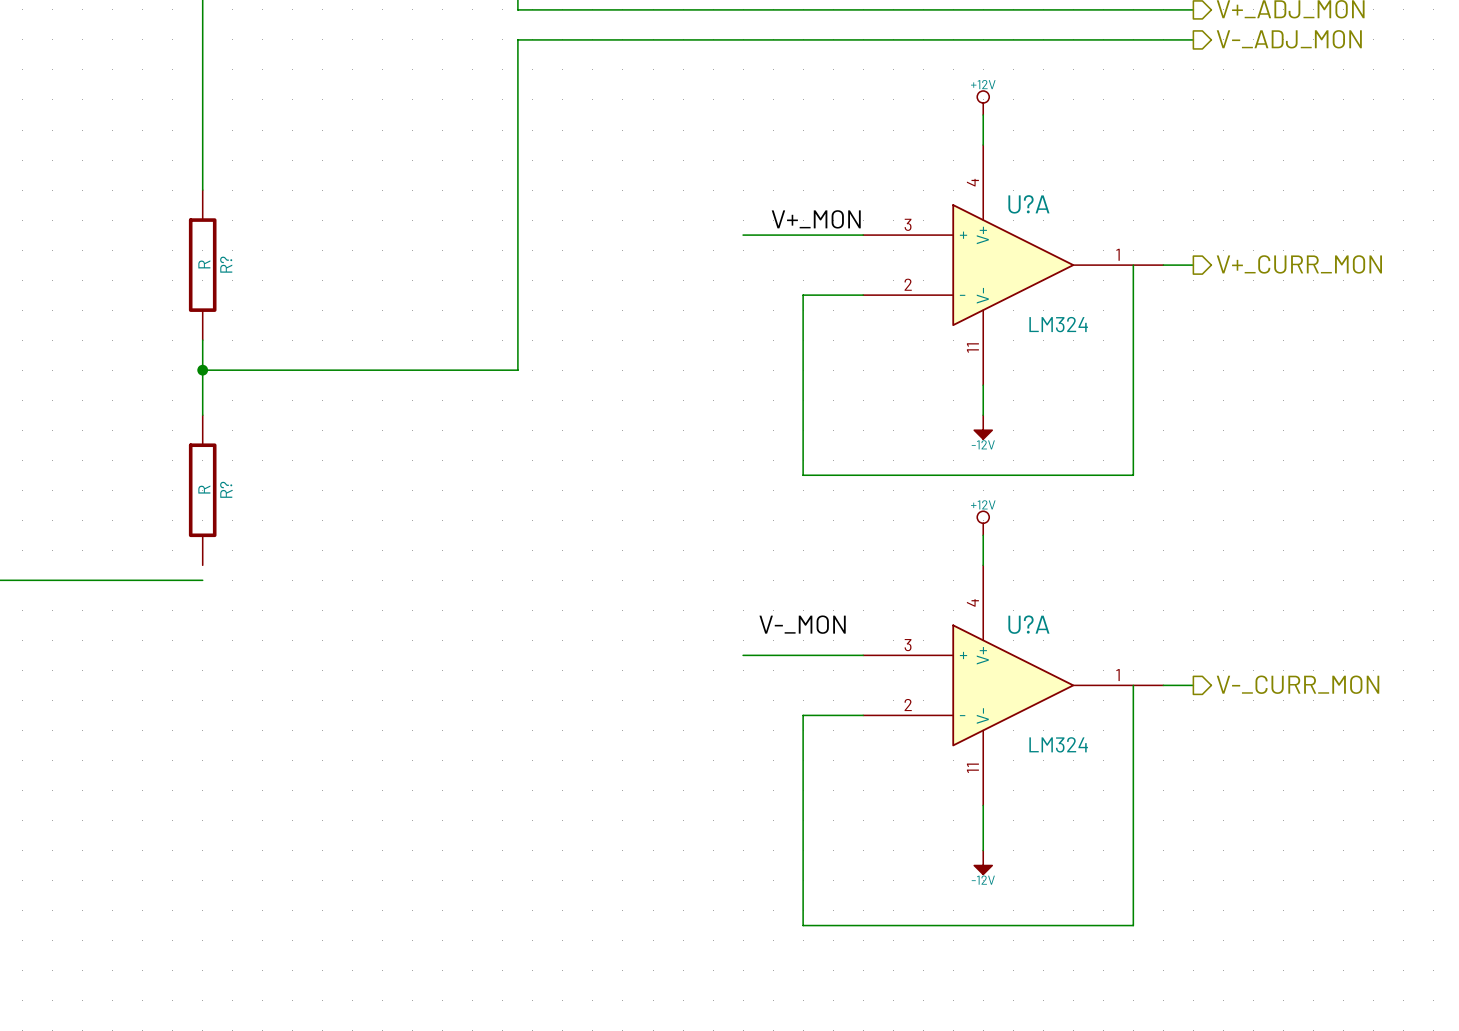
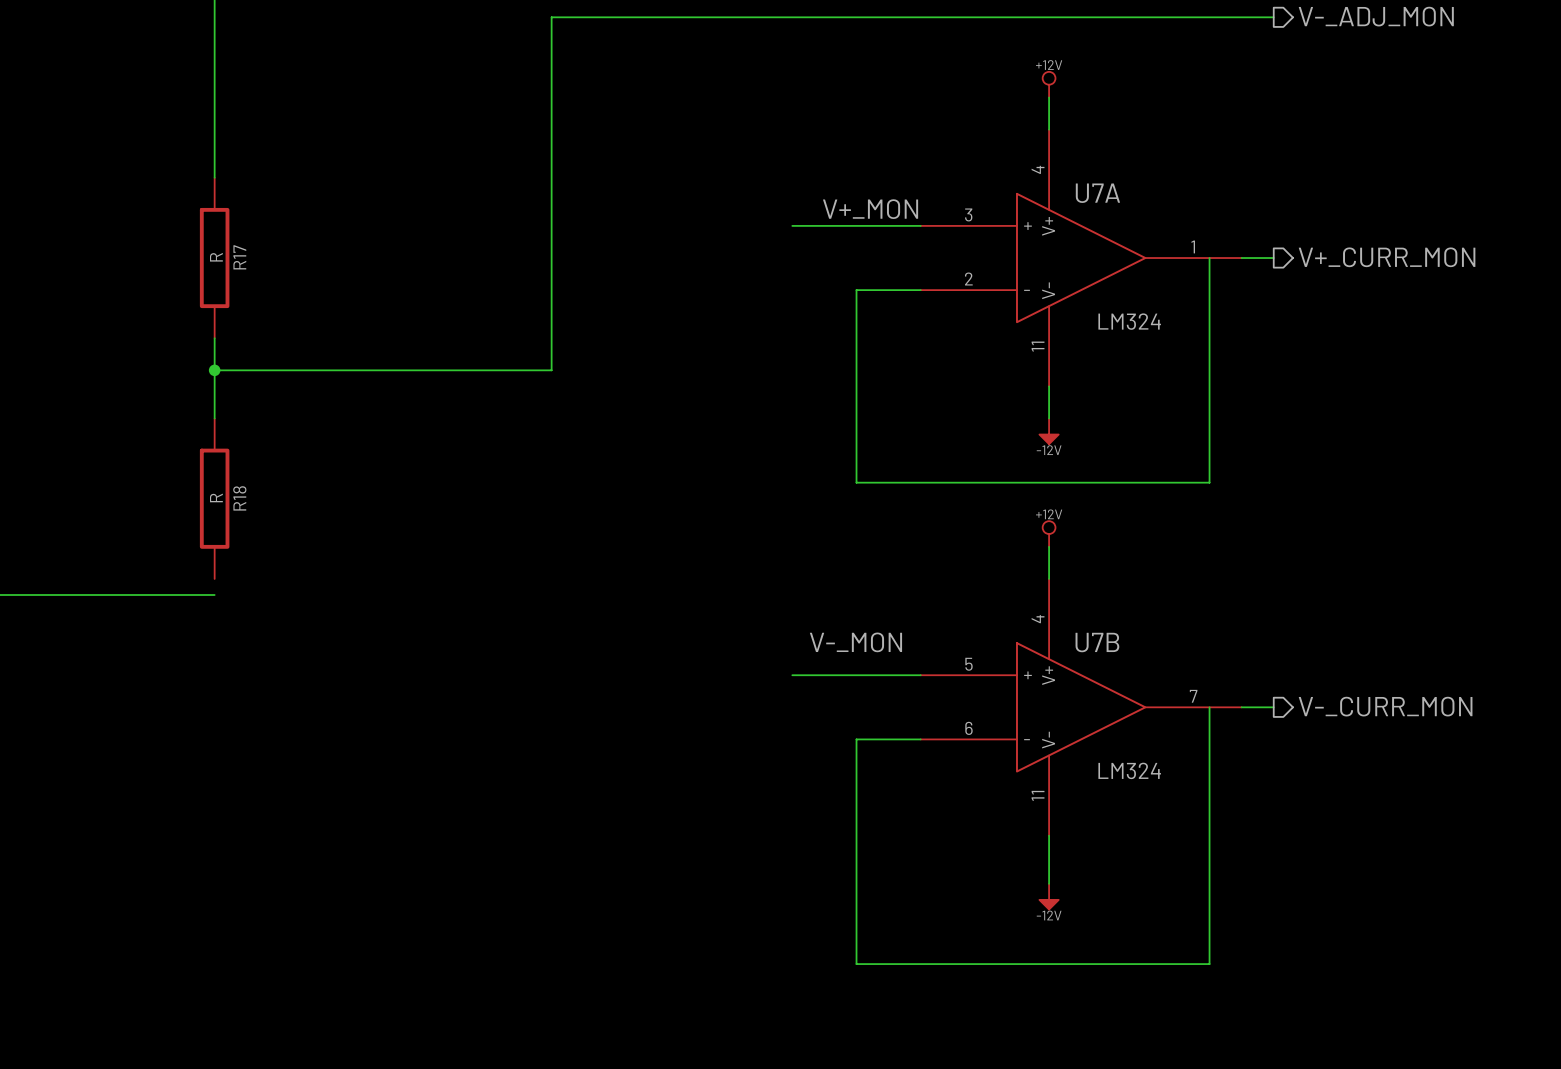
U?A name: U?A (1028, 204) -> U7A (1097, 193)
R? name: R? (226, 264) -> R17 (239, 257)
R? name: R? (226, 489) -> R18 (239, 498)
U?A name: U?A (1028, 624) -> U7B (1097, 642)
U?A pin number: 3 (908, 645) -> 5 (968, 664)
U?A pin number: 1 (1118, 675) -> 7 (1193, 696)
U?A pin number: 2 (908, 705) -> 6 (968, 728)

